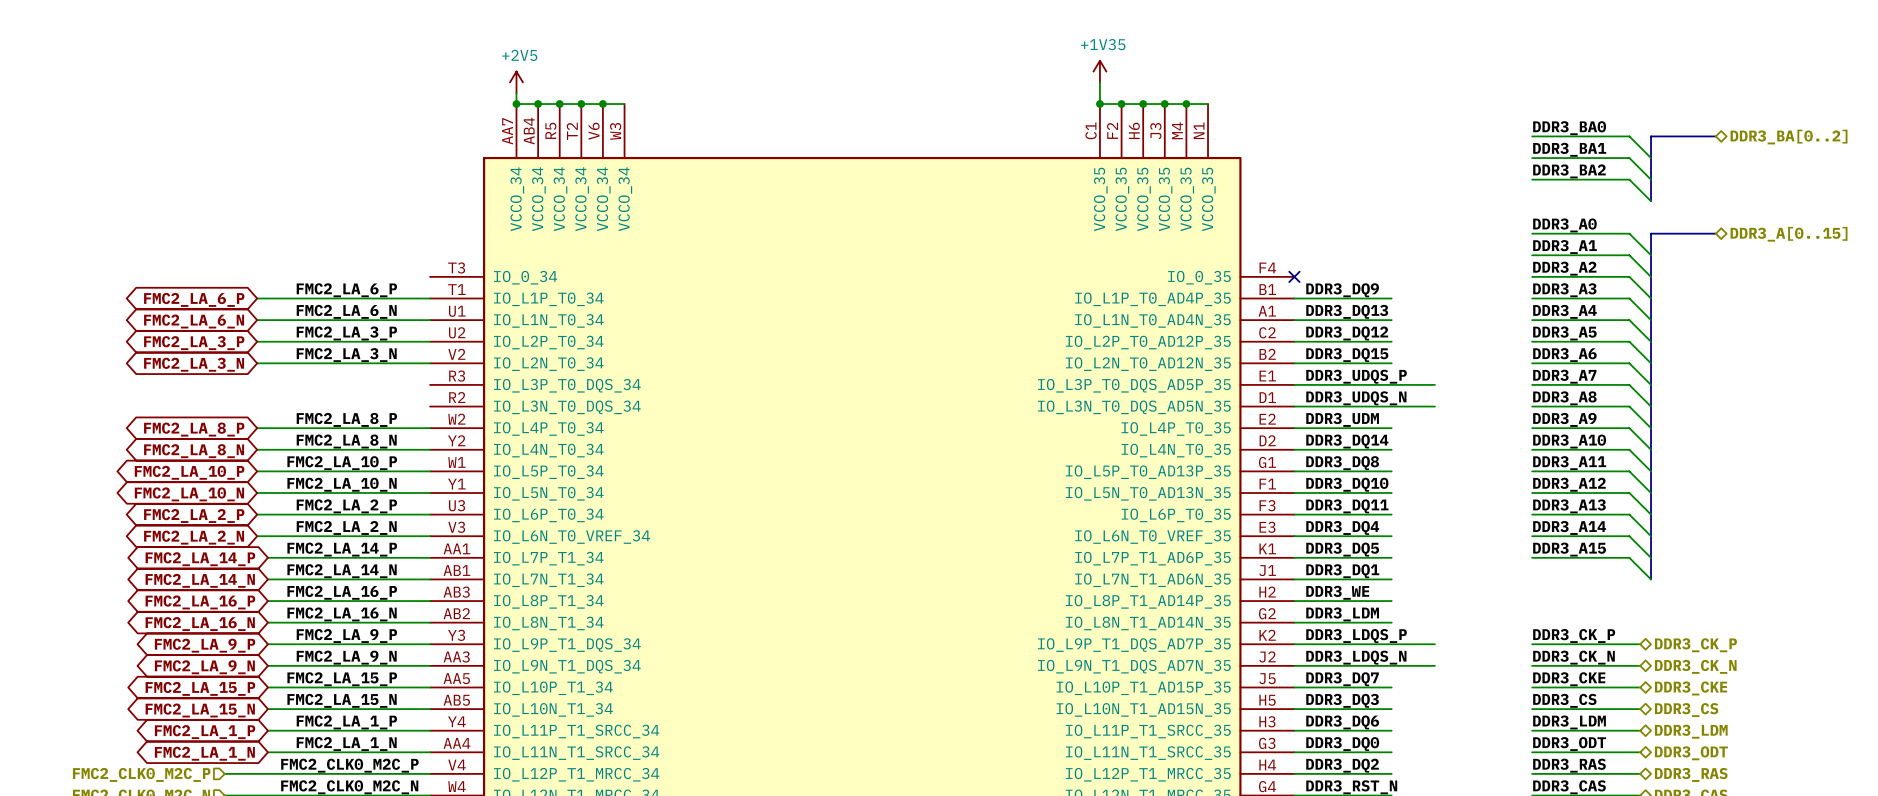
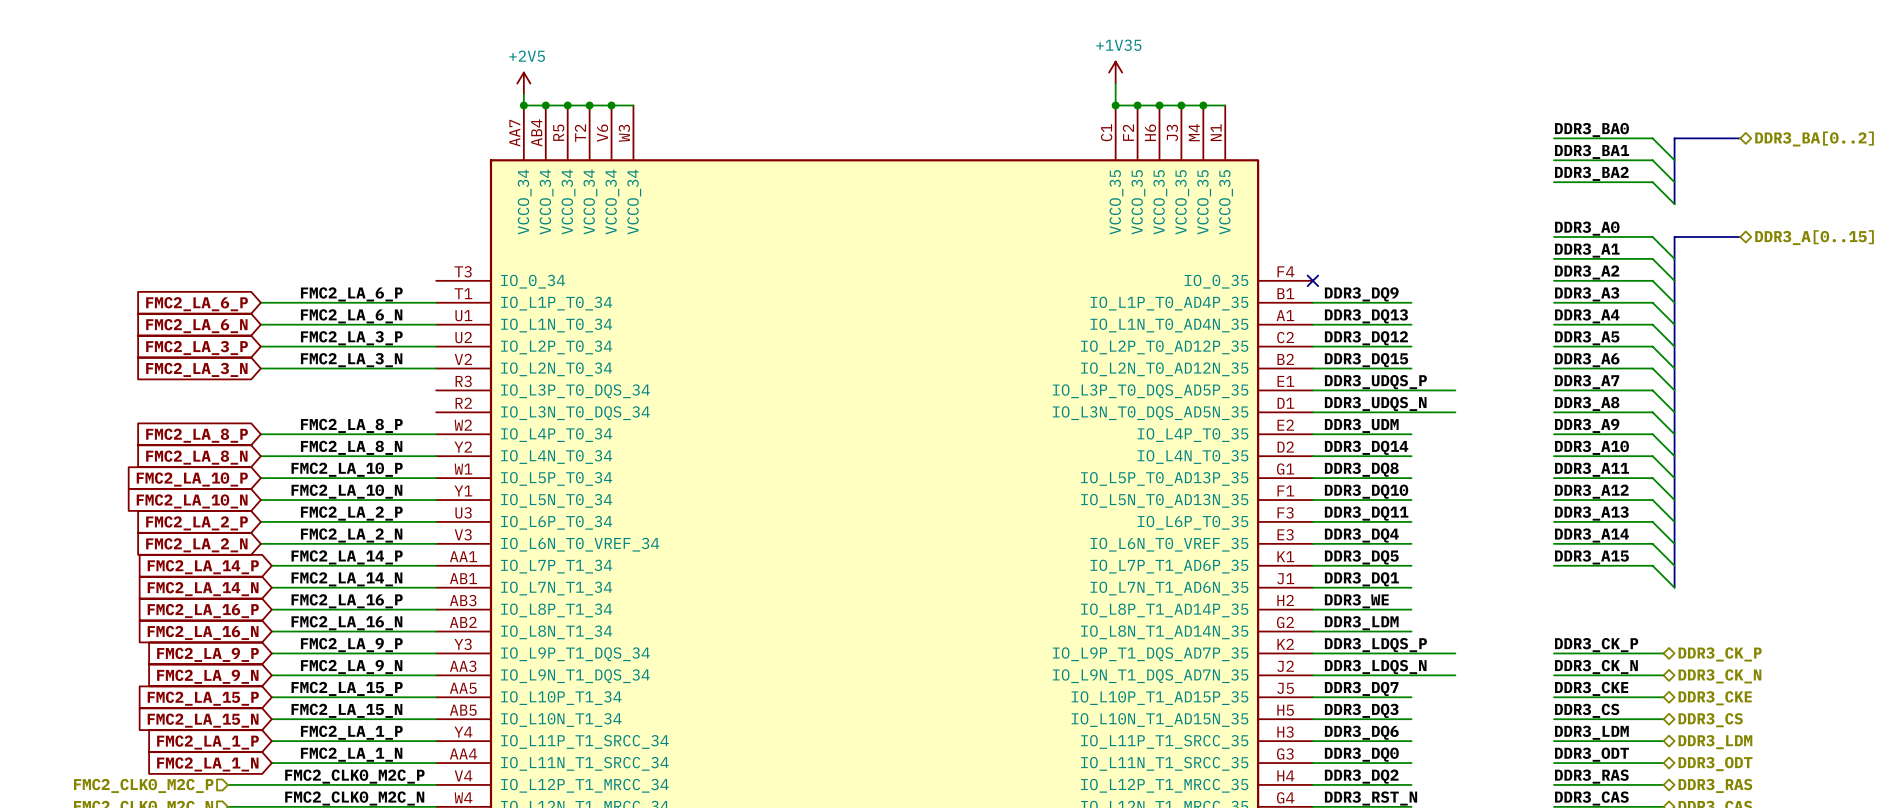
global label shape: bidirectional (194, 299) -> input (197, 304)
global label shape: bidirectional (194, 321) -> input (196, 326)
global label shape: bidirectional (194, 343) -> input (197, 348)
global label shape: bidirectional (194, 364) -> input (196, 369)
global label shape: bidirectional (194, 429) -> input (197, 435)
global label shape: bidirectional (194, 451) -> input (196, 457)
global label shape: bidirectional (189, 472) -> input (192, 479)
global label shape: bidirectional (189, 494) -> input (192, 501)
global label shape: bidirectional (194, 515) -> input (197, 523)
global label shape: bidirectional (194, 537) -> input (196, 545)
global label shape: bidirectional (200, 559) -> input (203, 567)
global label shape: bidirectional (200, 580) -> input (203, 589)
global label shape: bidirectional (200, 602) -> input (203, 611)
global label shape: bidirectional (200, 624) -> input (203, 632)
global label shape: bidirectional (205, 645) -> input (207, 654)
global label shape: bidirectional (204, 667) -> input (207, 676)
global label shape: bidirectional (200, 688) -> input (203, 698)
global label shape: bidirectional (200, 710) -> input (203, 720)
global label shape: bidirectional (205, 732) -> input (207, 742)
global label shape: bidirectional (204, 753) -> input (207, 764)

